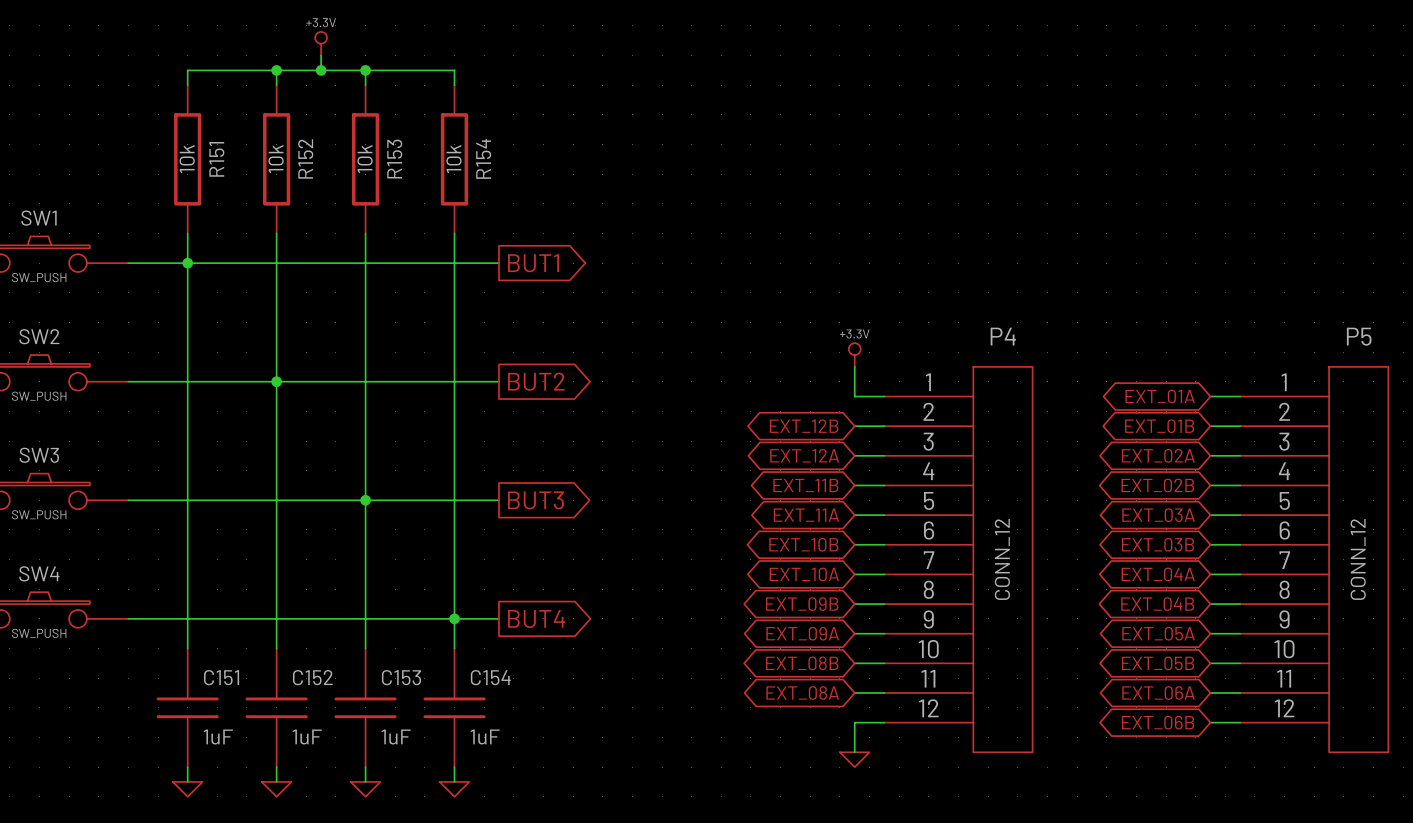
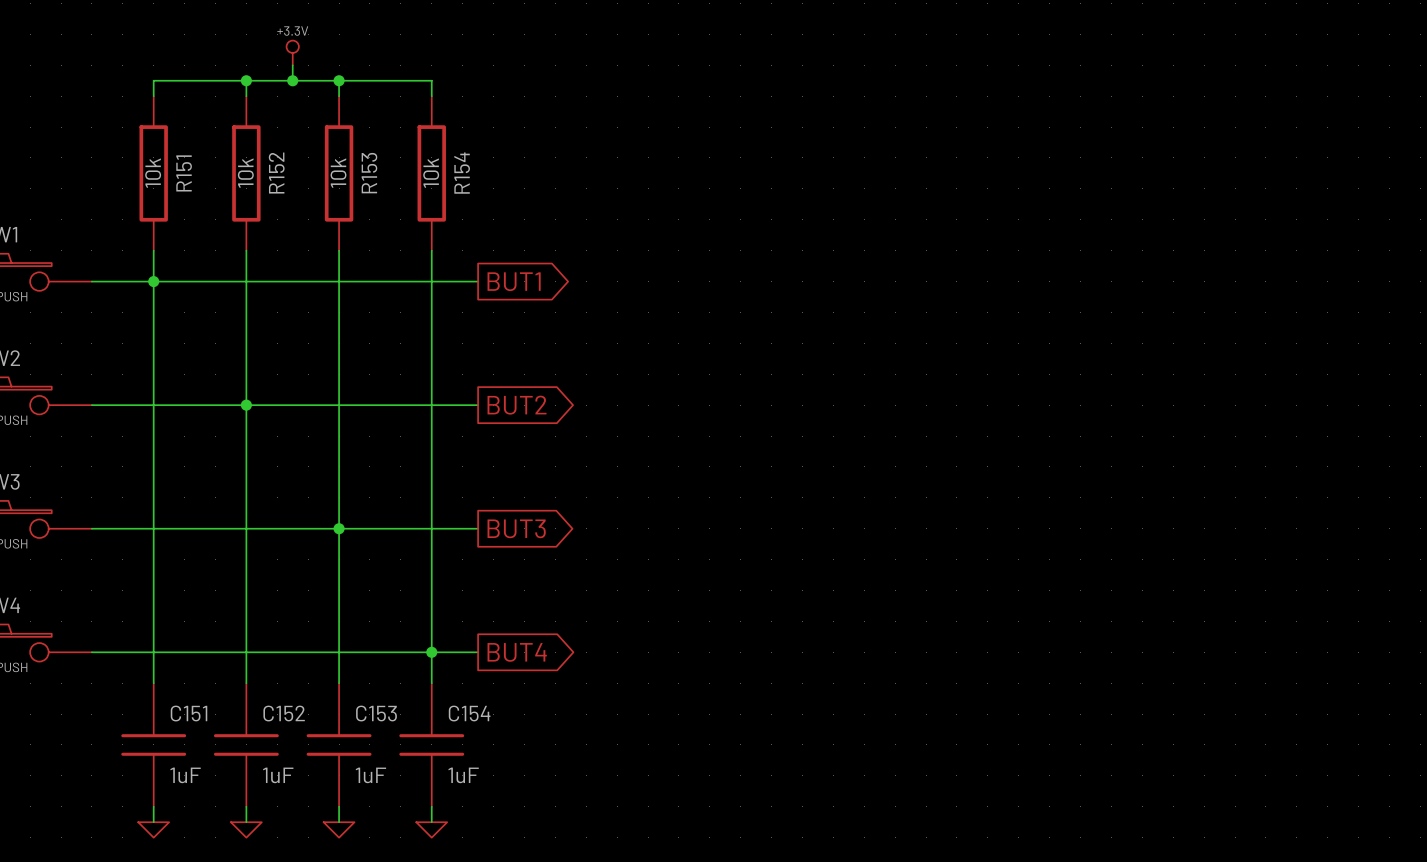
power symbol: +3.3V (854, 355) -> none
wire: (854, 366) (854, 396) (884, 396) -> none
global label: EXT_01A (1160, 396) -> none
wire: (1210, 396) (1240, 396) -> none
global label: EXT_12B (804, 426) -> none
wire: (854, 426) (884, 426) -> none
global label: EXT_01B (1159, 426) -> none
wire: (1210, 426) (1240, 426) -> none
global label: EXT_12A (804, 455) -> none
wire: (854, 455) (884, 455) -> none
global label: EXT_02A (1158, 455) -> none
wire: (1210, 455) (1240, 455) -> none
global label: EXT_11B (805, 485) -> none
wire: (854, 485) (884, 485) -> none
global label: EXT_02B (1157, 485) -> none
wire: (1210, 485) (1240, 485) -> none
global label: EXT_11A (806, 515) -> none
wire: (854, 515) (884, 515) -> none
global label: EXT_03A (1158, 515) -> none
wire: (1210, 515) (1240, 515) -> none
global label: EXT_10B (803, 544) -> none
wire: (854, 544) (884, 544) -> none
global label: EXT_03B (1158, 544) -> none
wire: (1210, 544) (1240, 544) -> none
P4: CONN_12 (958, 559) -> none
P5: CONN_12 (1314, 559) -> none
global label: EXT_10A (804, 574) -> none
wire: (854, 574) (884, 574) -> none
global label: EXT_04A (1158, 574) -> none
wire: (1210, 574) (1240, 574) -> none
global label: EXT_09B (802, 604) -> none
wire: (854, 604) (884, 604) -> none
global label: EXT_04B (1157, 604) -> none
wire: (1210, 604) (1240, 604) -> none
global label: EXT_09A (802, 633) -> none
wire: (854, 633) (884, 633) -> none
global label: EXT_05A (1158, 633) -> none
wire: (1210, 633) (1240, 633) -> none
global label: EXT_08B (802, 663) -> none
wire: (854, 663) (884, 663) -> none
global label: EXT_05B (1158, 663) -> none
wire: (1210, 663) (1240, 663) -> none
global label: EXT_08A (802, 693) -> none
wire: (854, 693) (884, 693) -> none
global label: EXT_06A (1158, 693) -> none
wire: (1210, 693) (1240, 693) -> none
wire: (884, 722) (854, 722) (854, 752) -> none
global label: EXT_06B (1158, 722) -> none
wire: (1210, 722) (1240, 722) -> none
power symbol: (854, 759) -> none

